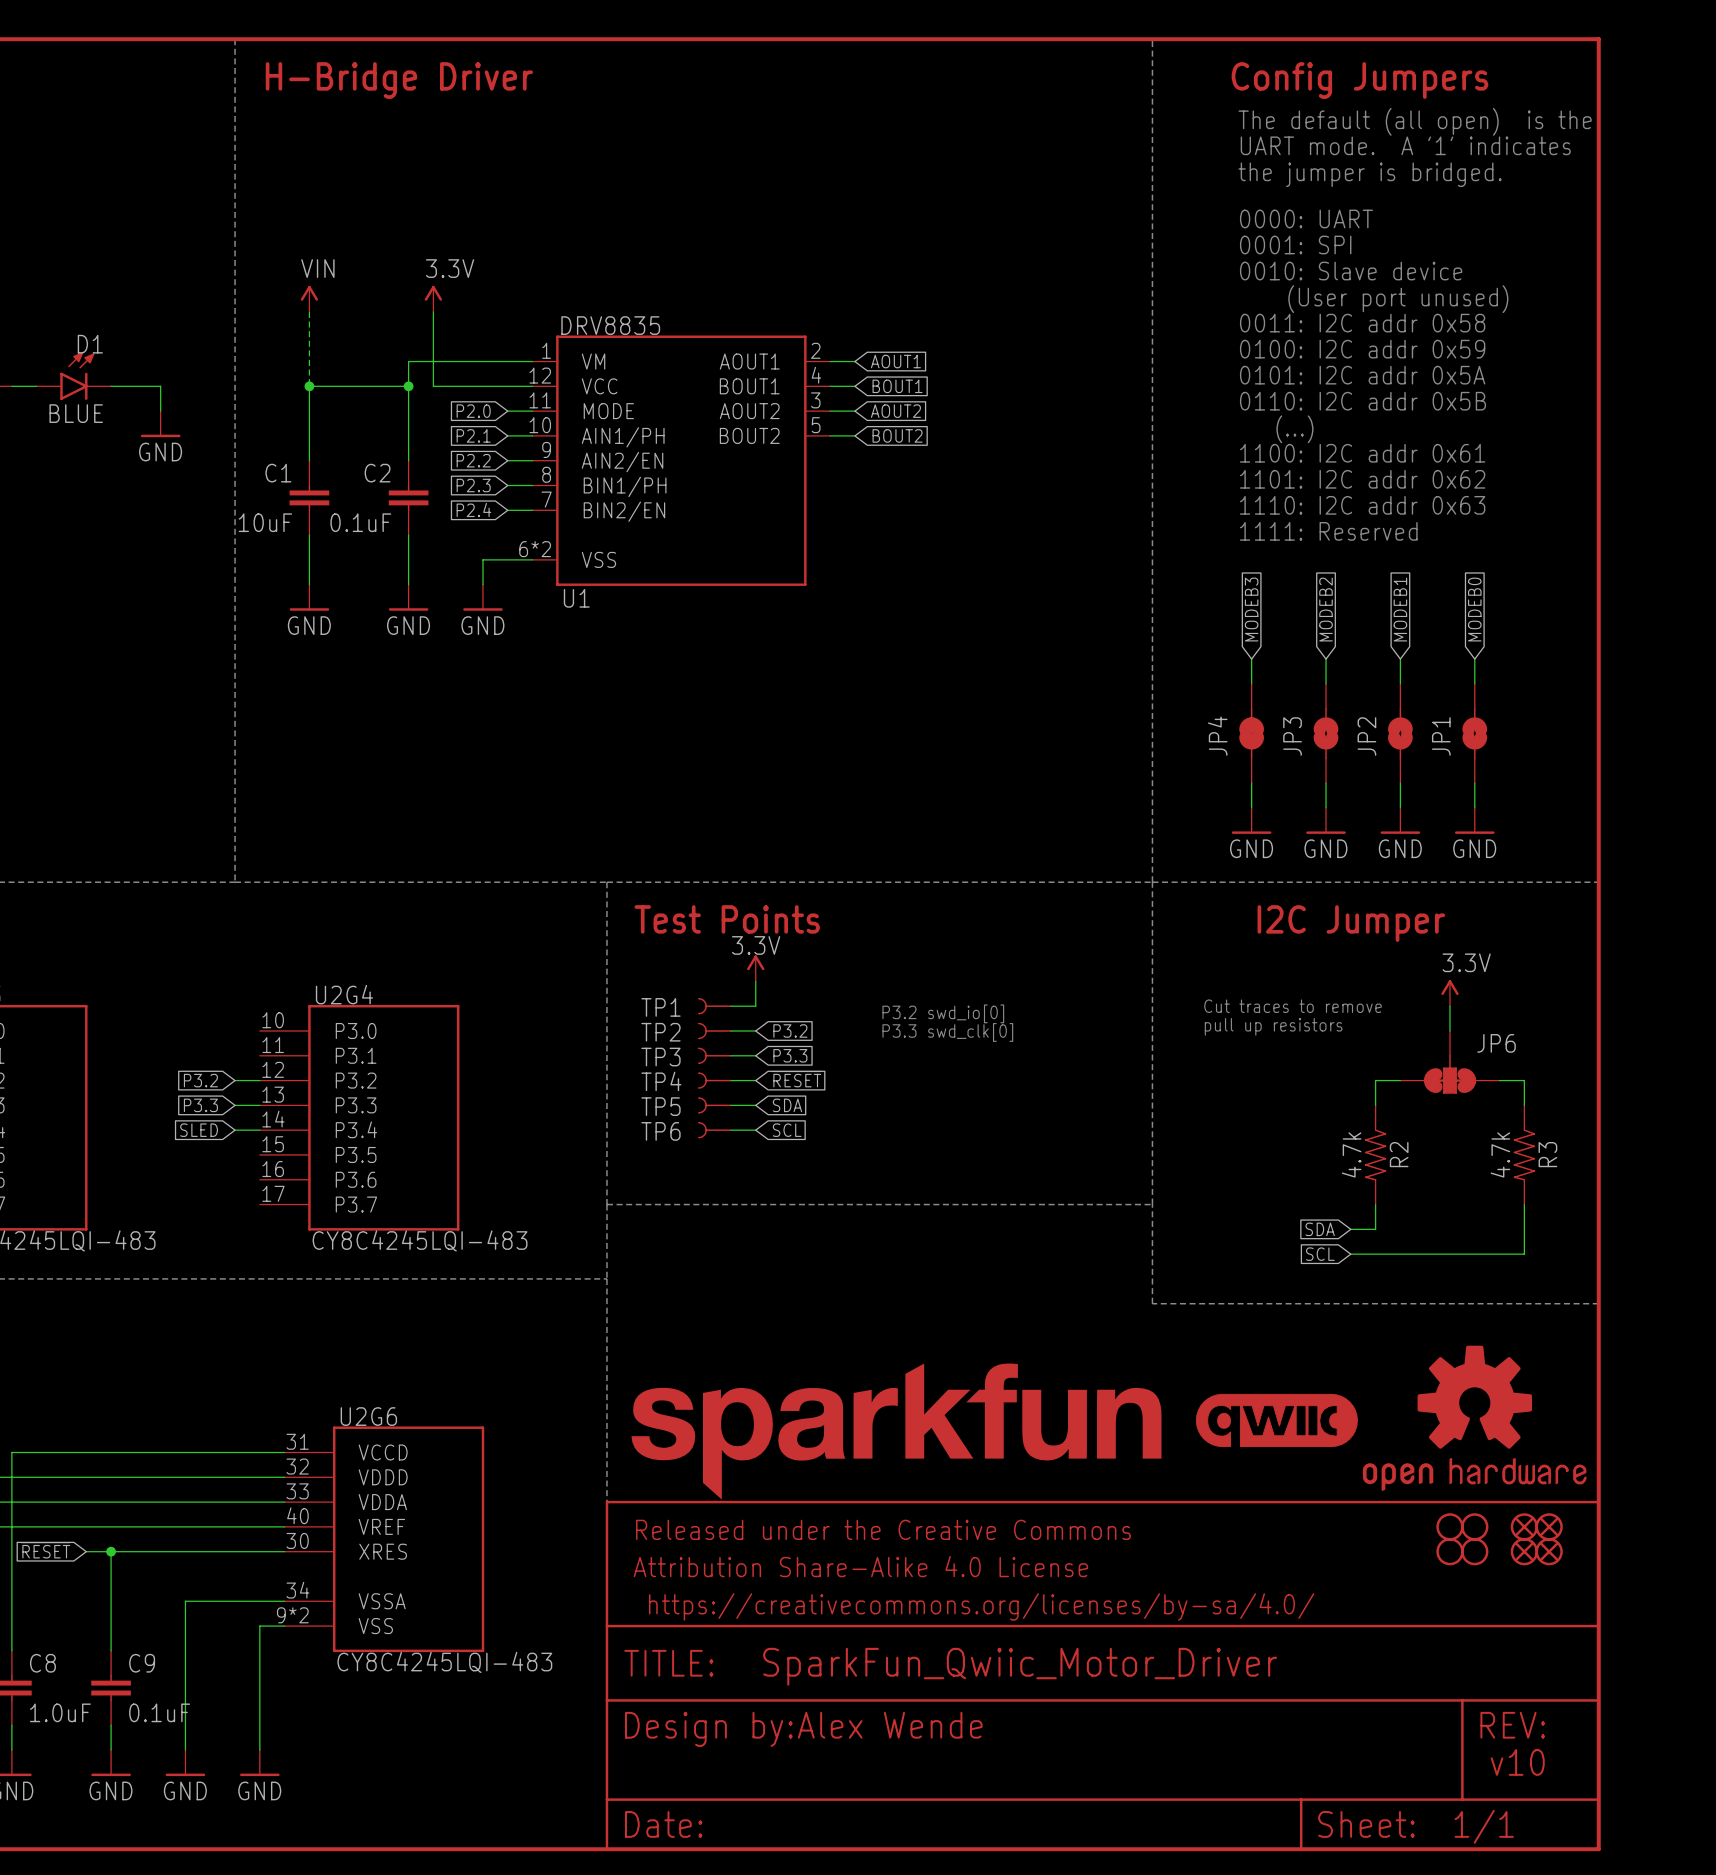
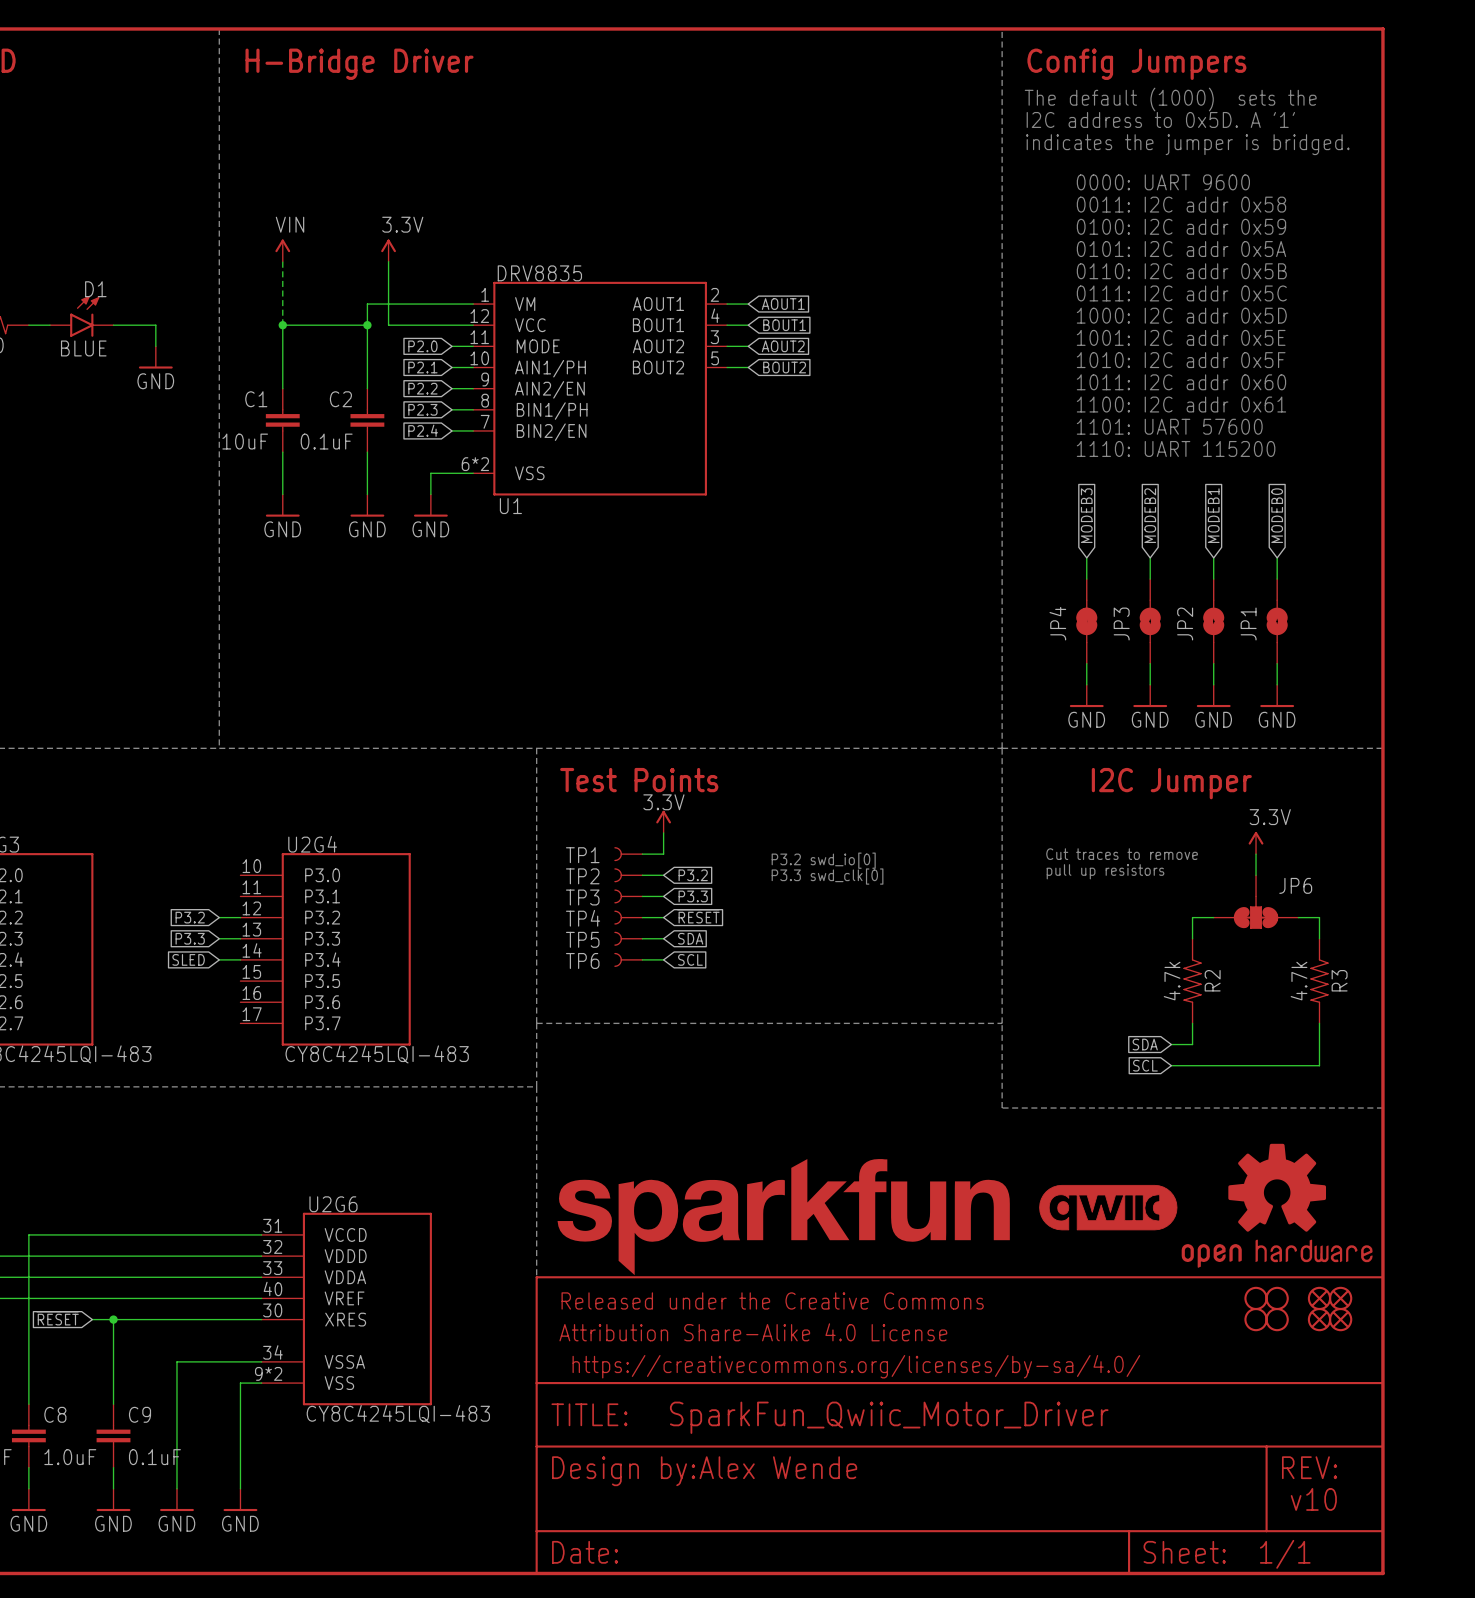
text position: Config Jumpers (1359, 80) -> Config Jumpers (1136, 64)
text: The default (all open) is the (1415, 121) -> The default (1000) sets the (1170, 99)
text: none -> I2C address to 0x5D. A '1' (1160, 119)
text: UART mode. A '1' indicates (1405, 145) -> none
text: the jumper is bridged. (1370, 174) -> indicates the jumper is bridged. (1187, 144)
text: 0000: UART (1306, 218) -> 0000: UART 9600 (1163, 182)
text: 0001: SPI (1295, 245) -> 0011: I2C addr 0x58 (1181, 204)
text: 0010: Slave device (1351, 271) -> 0100: I2C addr 0x59 (1181, 226)
text: (User port unused) (1398, 299) -> 0101: I2C addr 0x5A (1181, 249)
text: 0011: I2C addr 0x58 (1362, 323) -> 0110: I2C addr 0x5B (1181, 271)
text: 0100: I2C addr 0x59 (1362, 349) -> 0111: I2C addr 0x5C (1181, 293)
text: 0101: I2C addr 0x5A (1362, 375) -> 1000: I2C addr 0x5D (1181, 315)
text: 0110: I2C addr 0x5B (1363, 401) -> 1001: I2C addr 0x5E (1181, 337)
text: (...) (1294, 429) -> 1010: I2C addr 0x5F (1181, 360)
text: 1100: I2C addr 0x61 (1362, 453) -> 1011: I2C addr 0x60 (1181, 382)
text: 1101: I2C addr 0x62 (1362, 479) -> 1100: I2C addr 0x61 (1181, 404)
text: 1110: I2C addr 0x63 (1362, 505) -> 1101: UART 57600 (1169, 426)
text: 1111: Reserved (1328, 531) -> 1110: UART 115200 (1176, 448)

